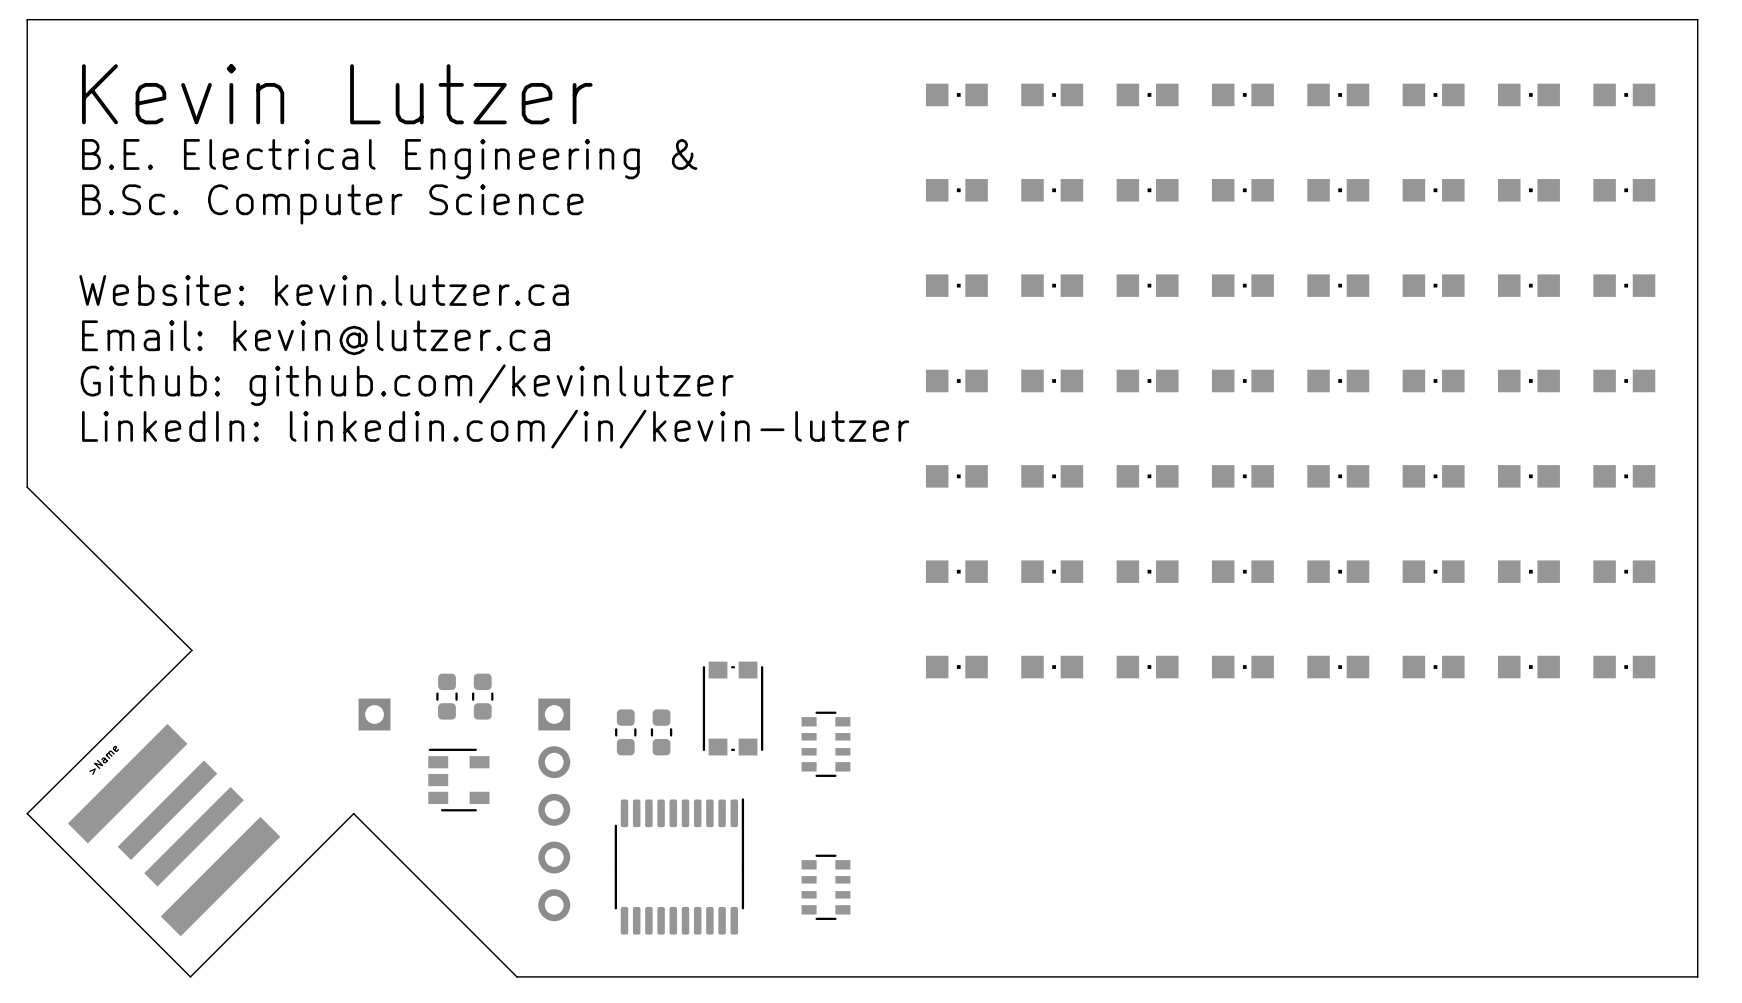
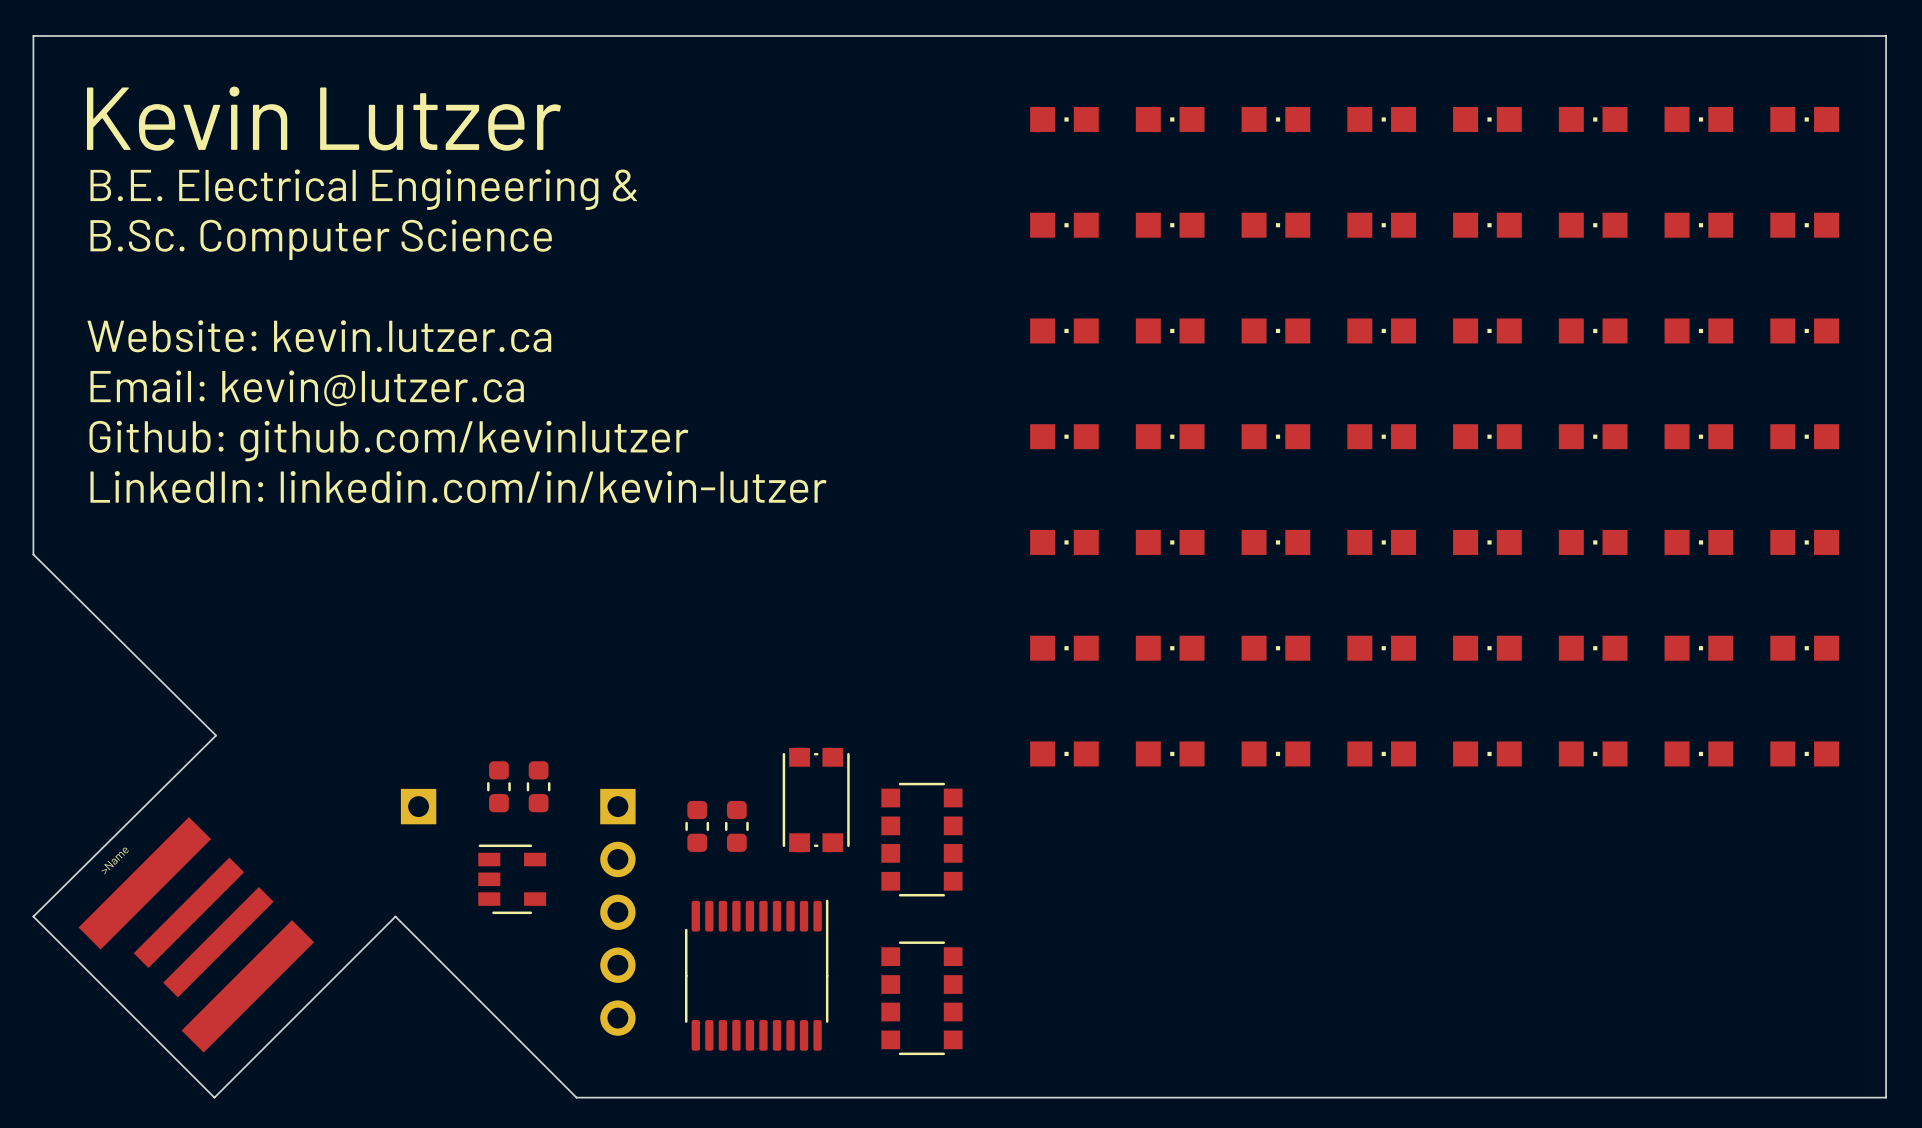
part footprint: [801, 711, 851, 777] -> [881, 782, 963, 897]
part footprint: [801, 854, 851, 920] -> [881, 941, 963, 1056]

